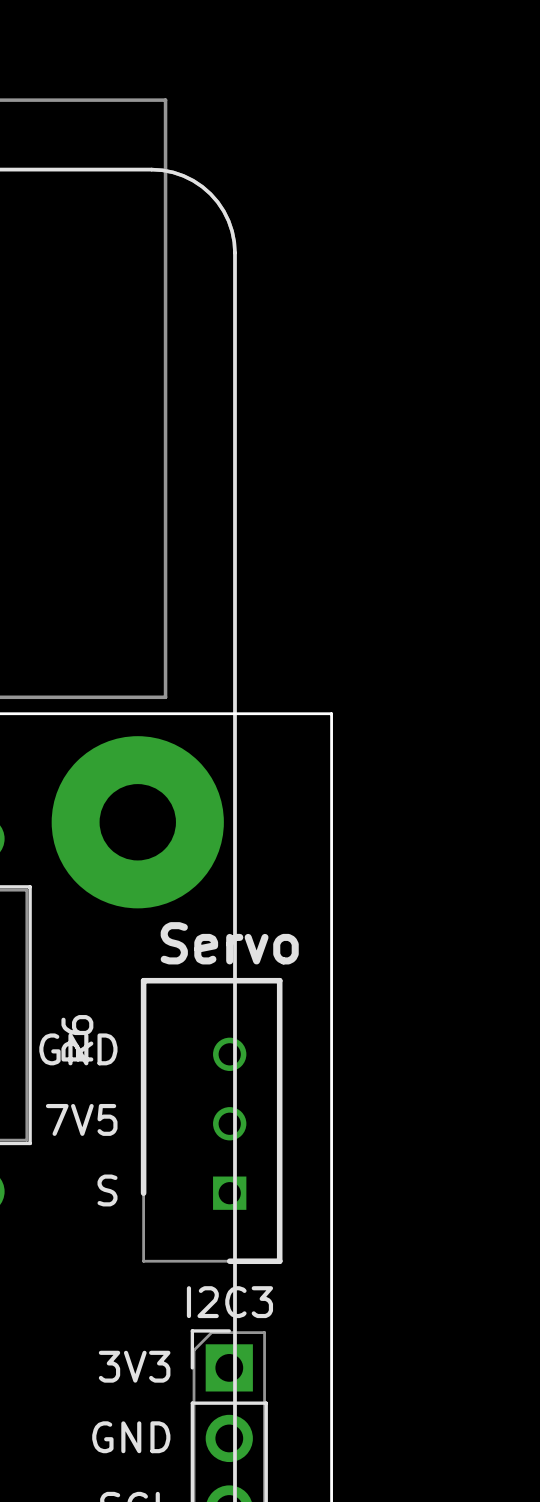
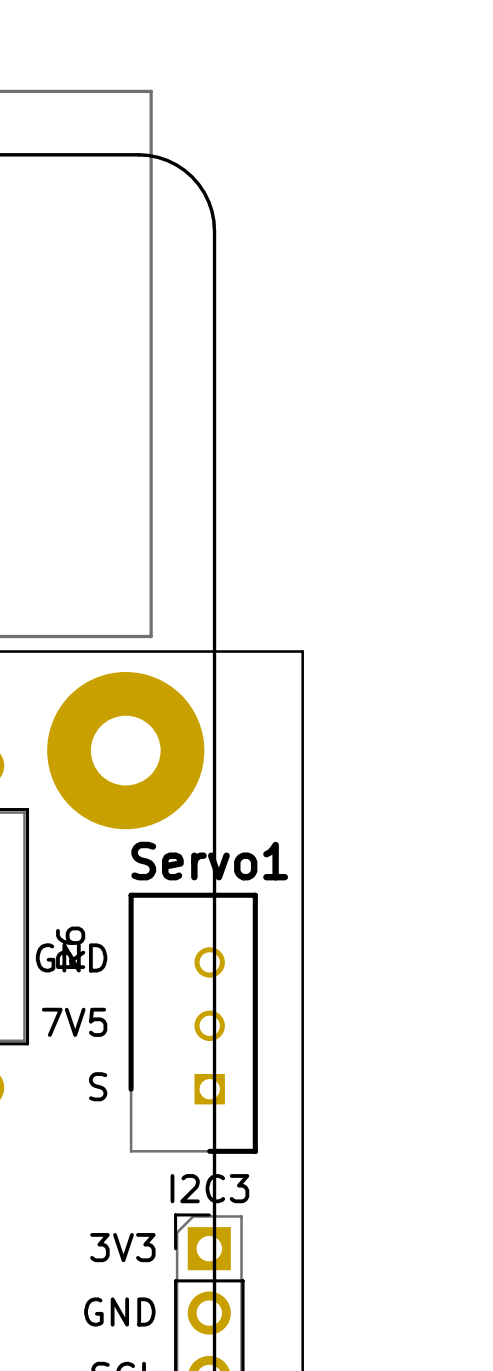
Servo name: Servo (229, 943) -> Servo1 (209, 861)

